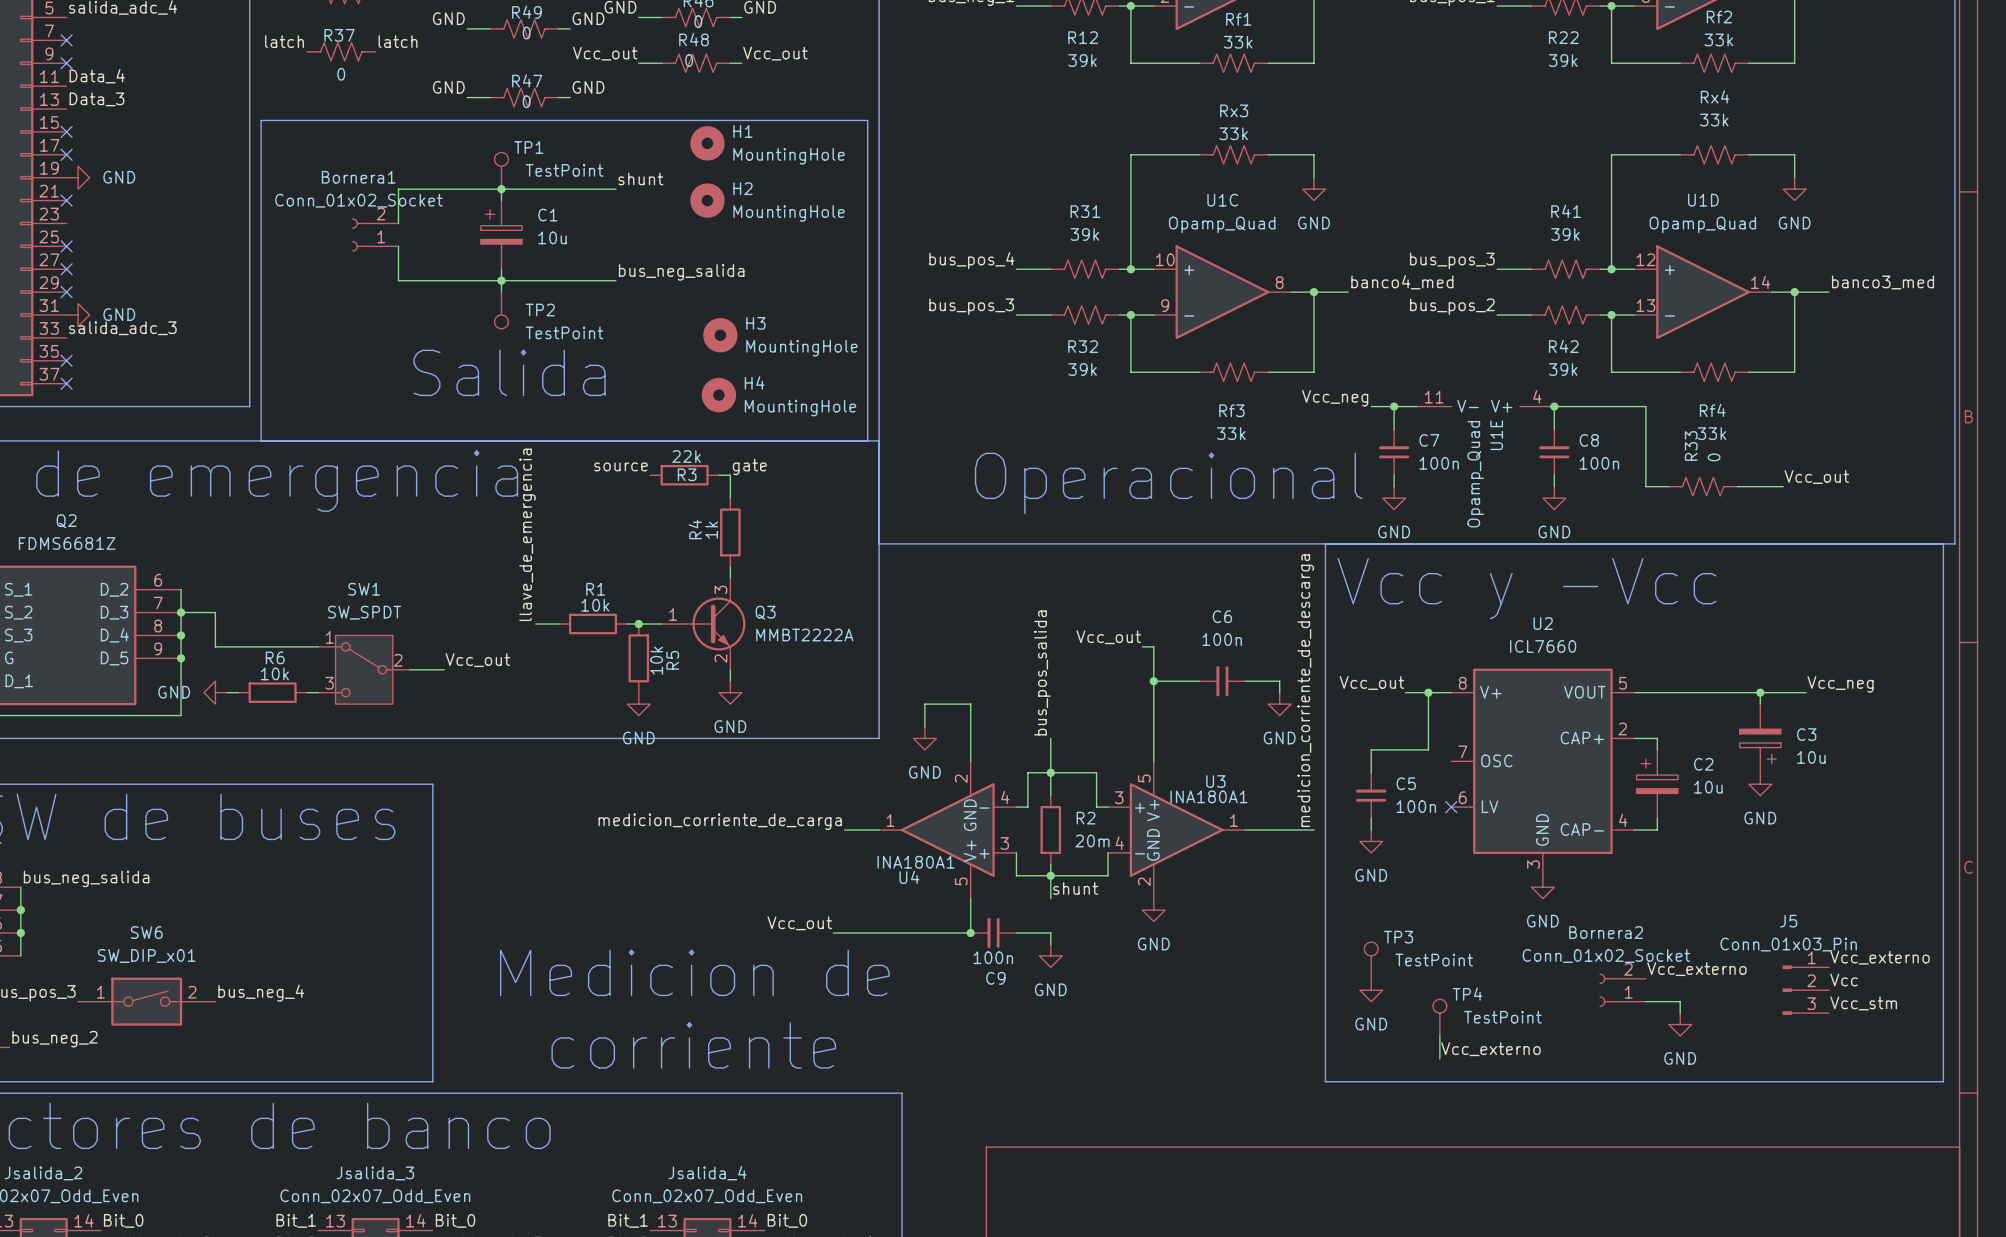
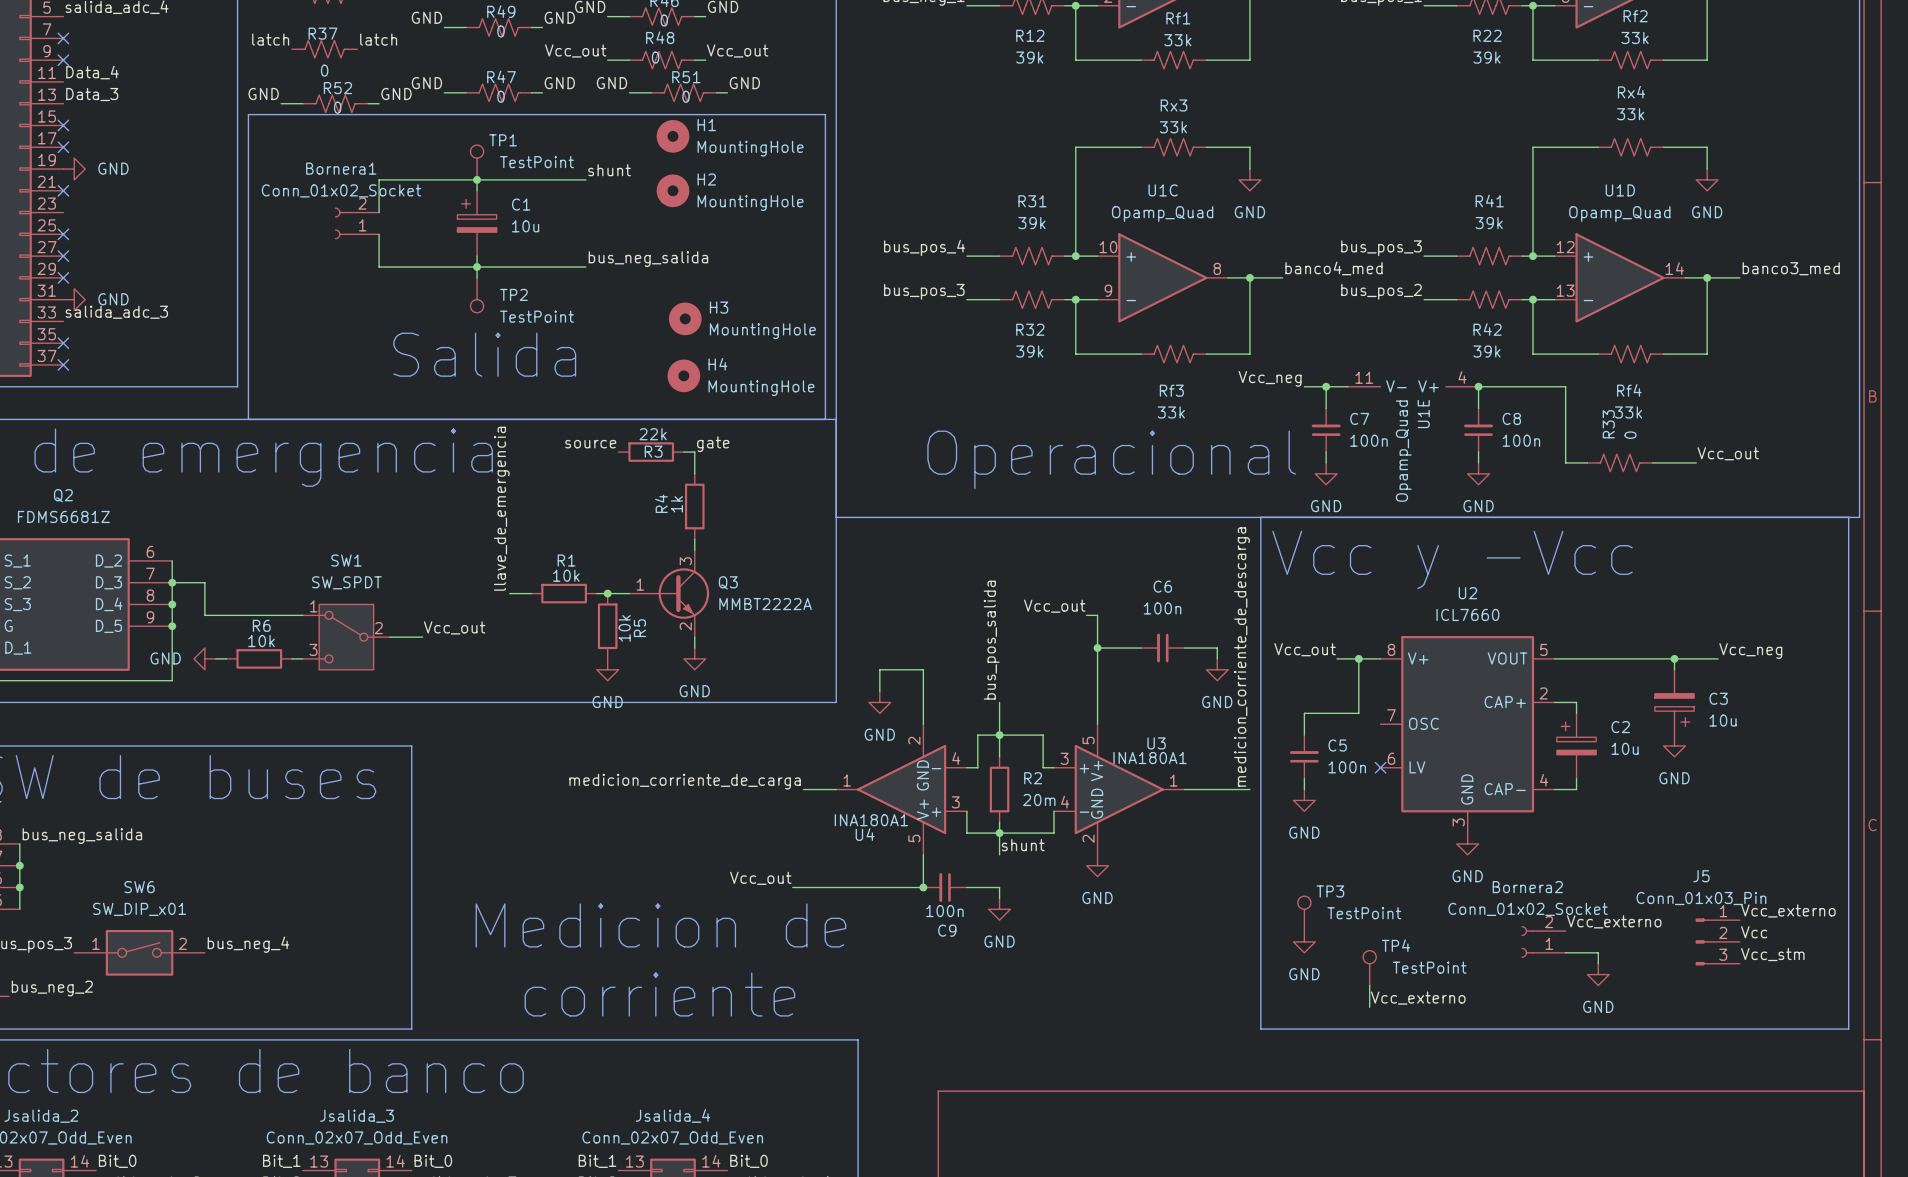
label: none -> GND (611, 83)
label: none -> GND (744, 83)
wire: none -> (629, 92) (651, 92)
R51: none -> 0 (683, 92)
wire: none -> (716, 92) (727, 92)
label: none -> GND (263, 94)
label: none -> GND (396, 94)
wire: none -> (281, 103) (302, 103)
R52: none -> 0 (335, 103)
wire: none -> (368, 103) (379, 103)

